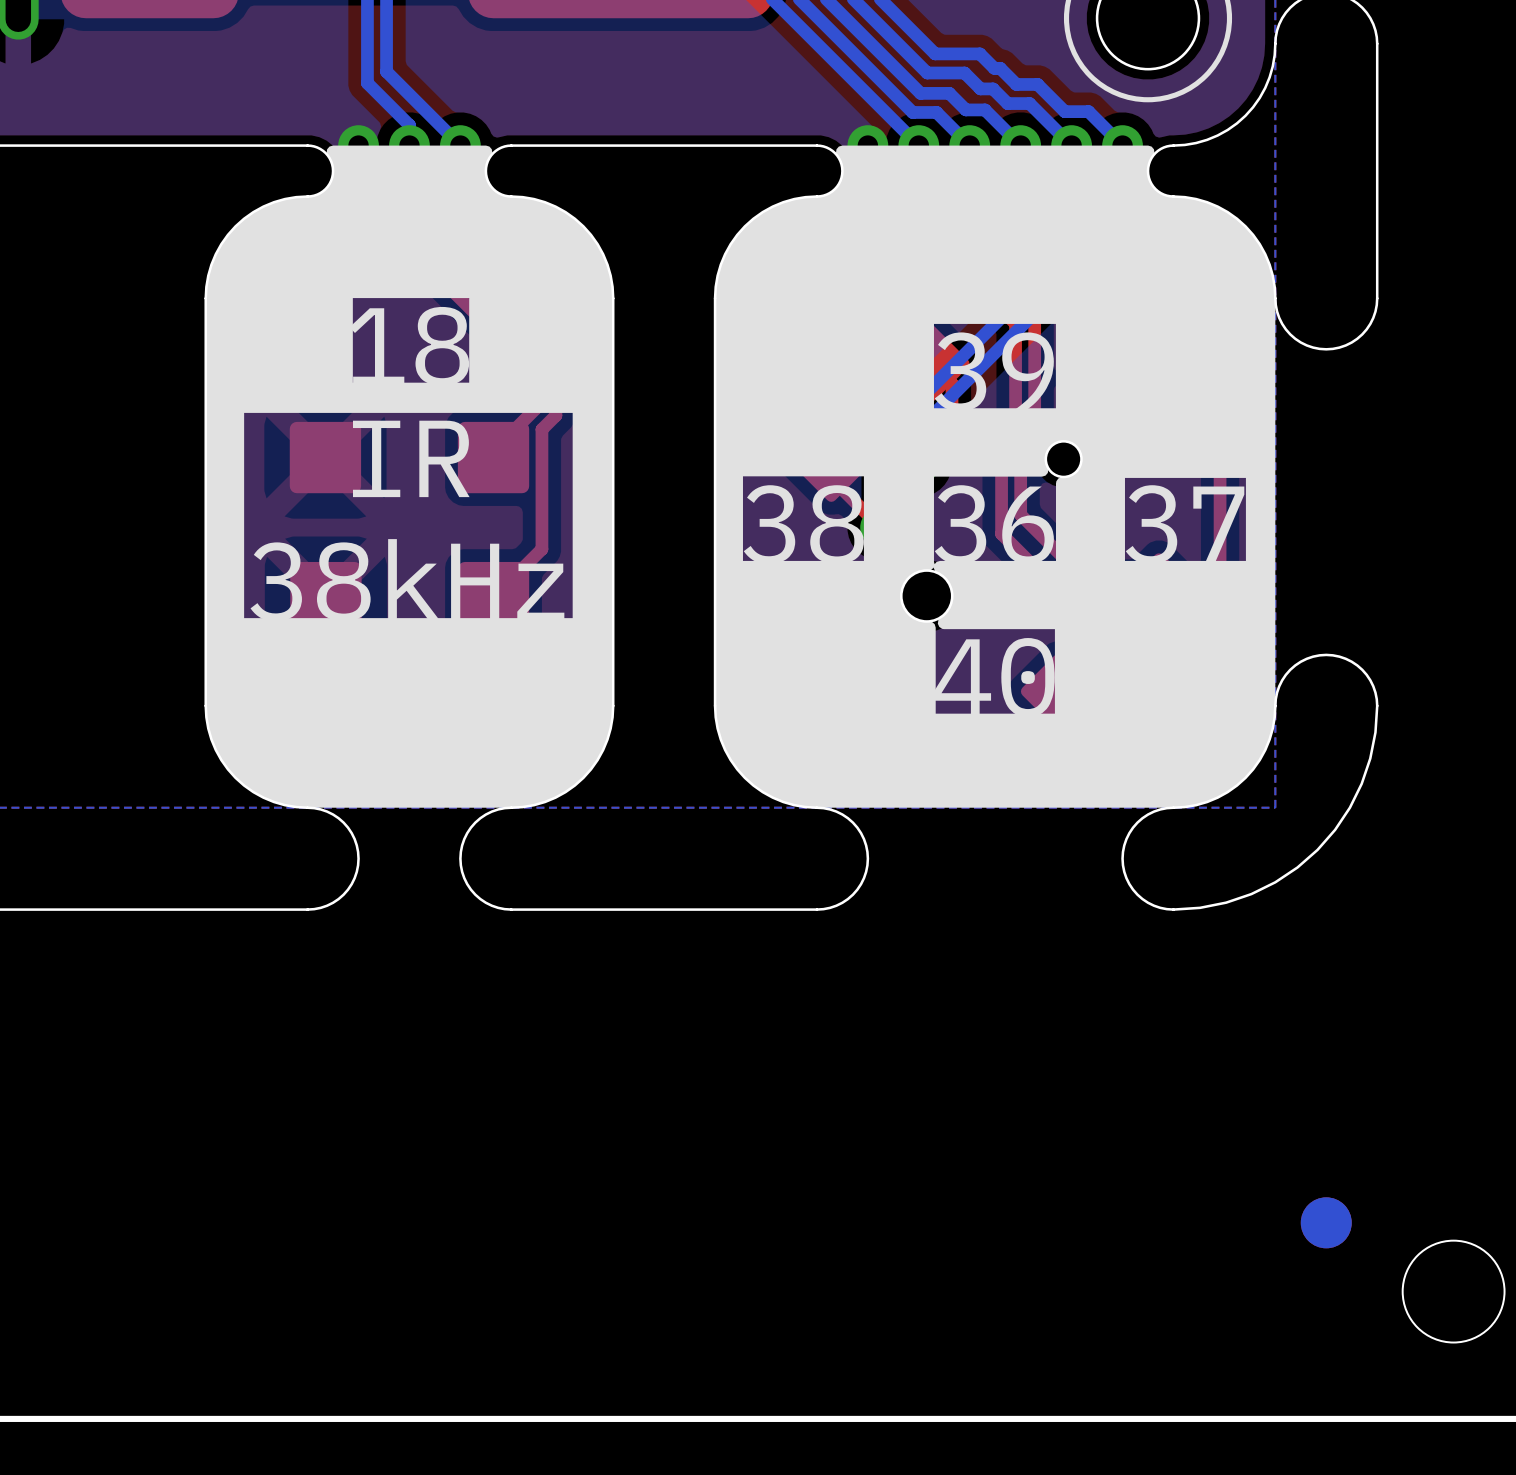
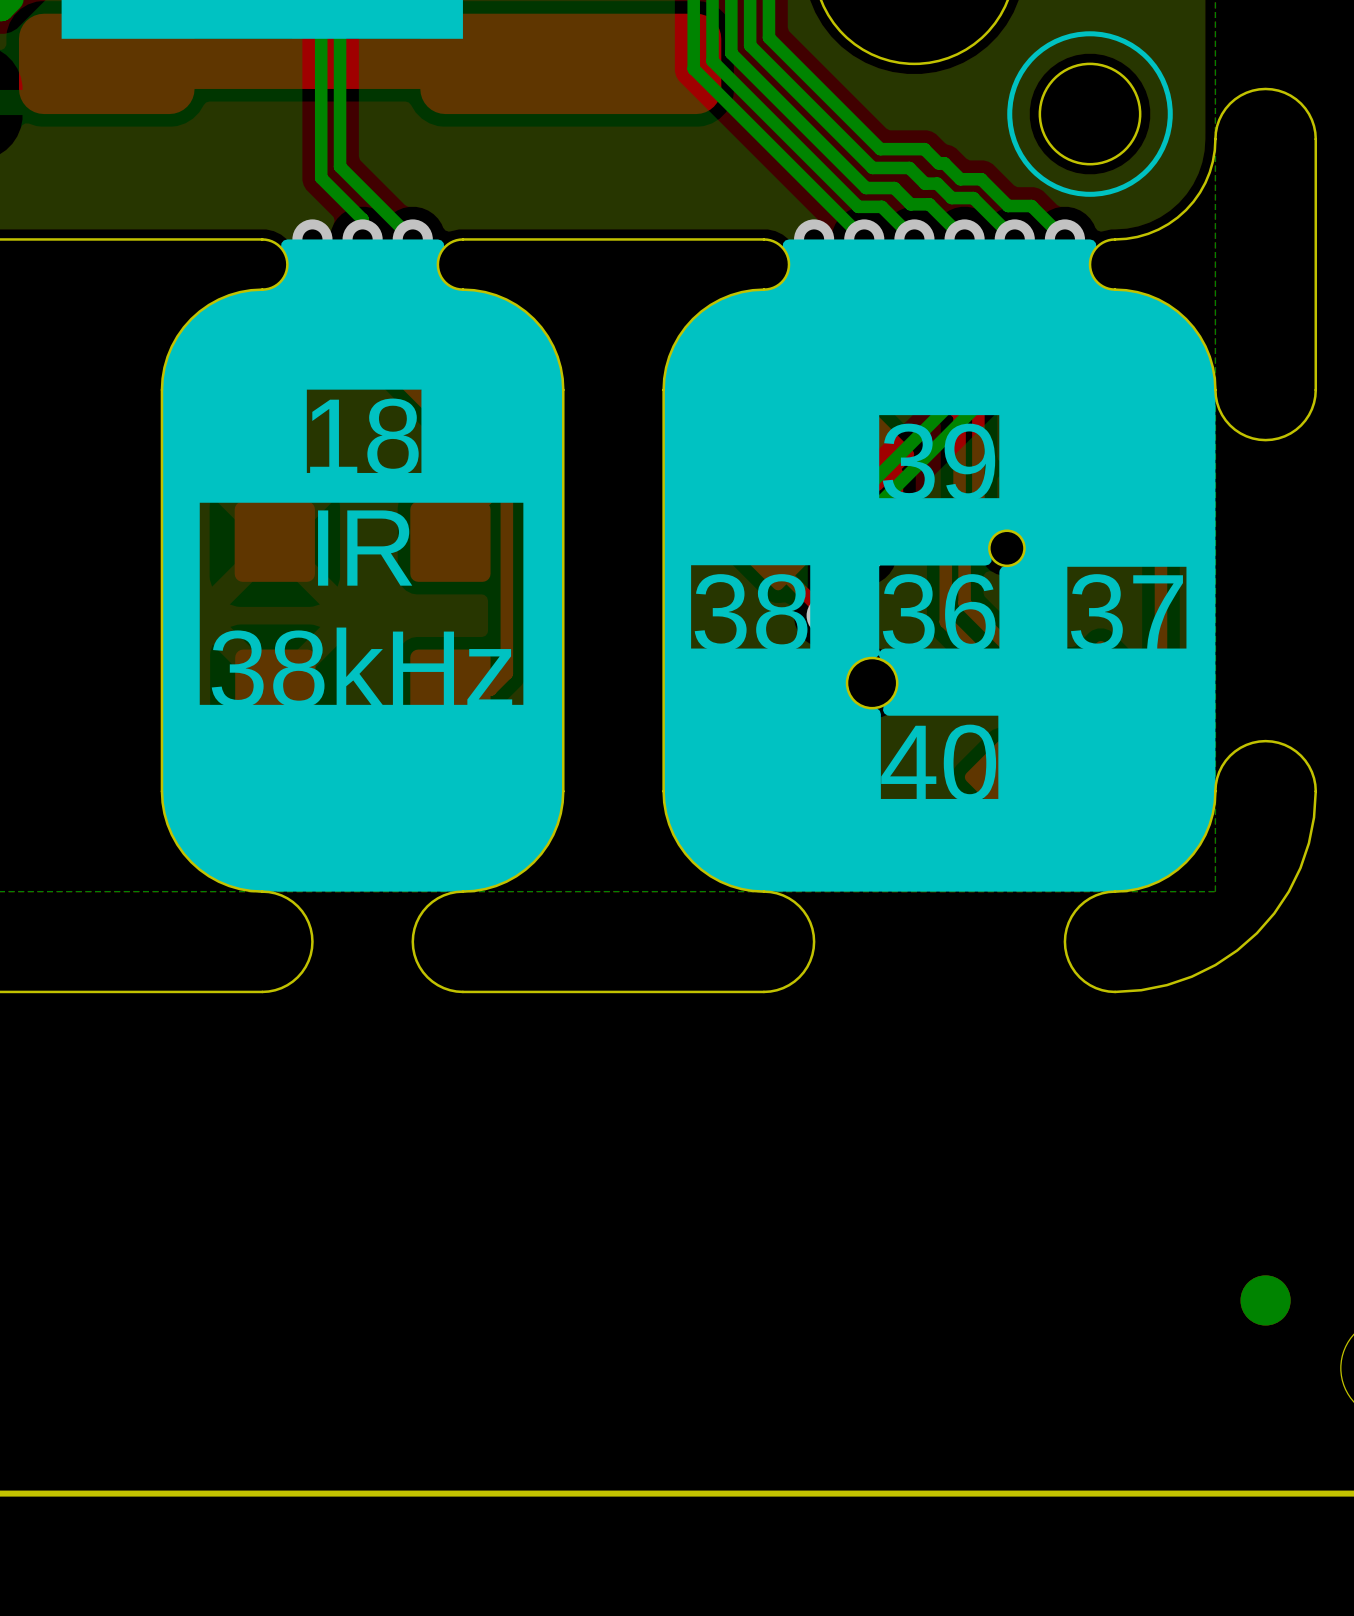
top track: (555, 415) (541, 429) (541, 549) (493, 597) (493, 661) -> (506, 505) (506, 673) (490, 689) (450, 689) (450, 742) (445, 747)
part footprint: [289, 421, 530, 634] -> [234, 501, 491, 730]

